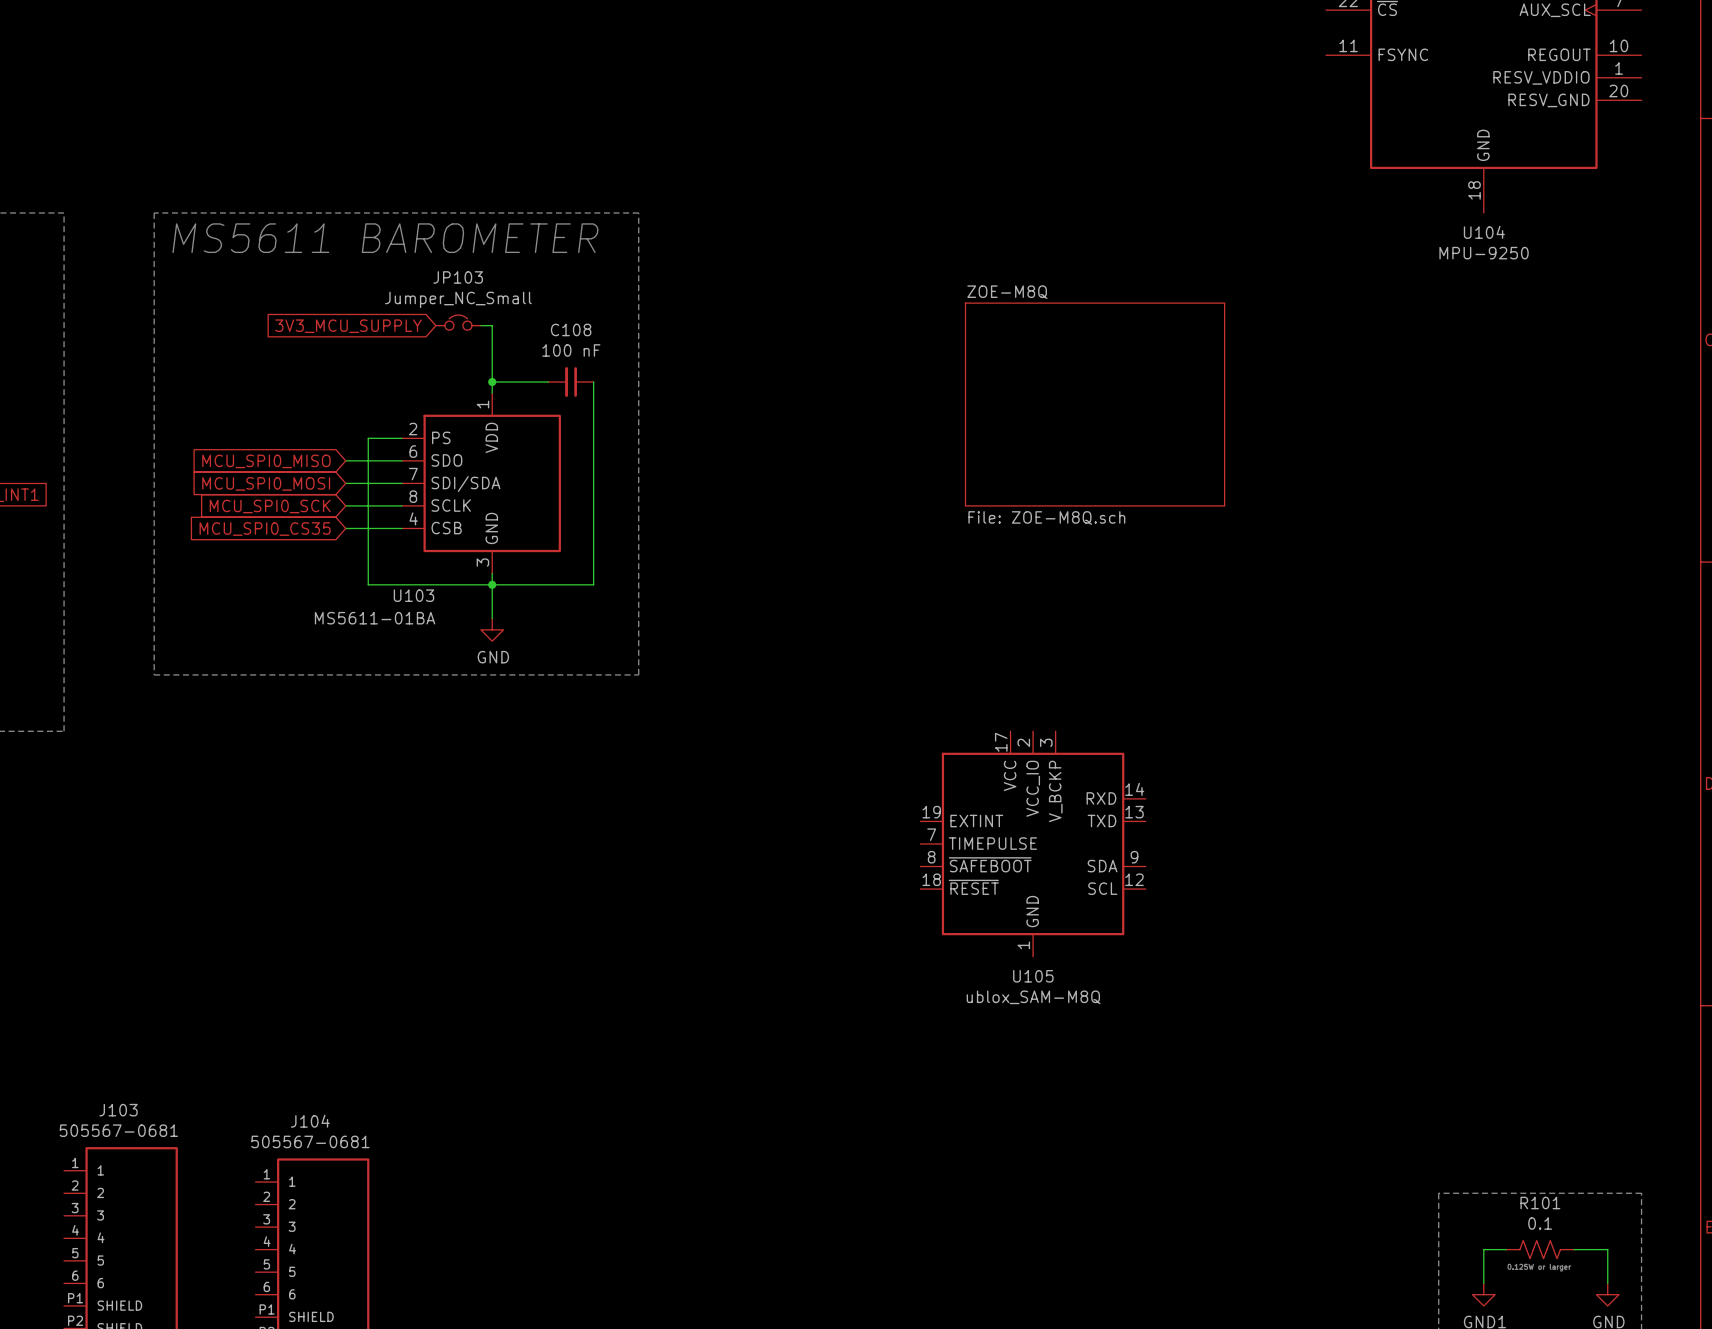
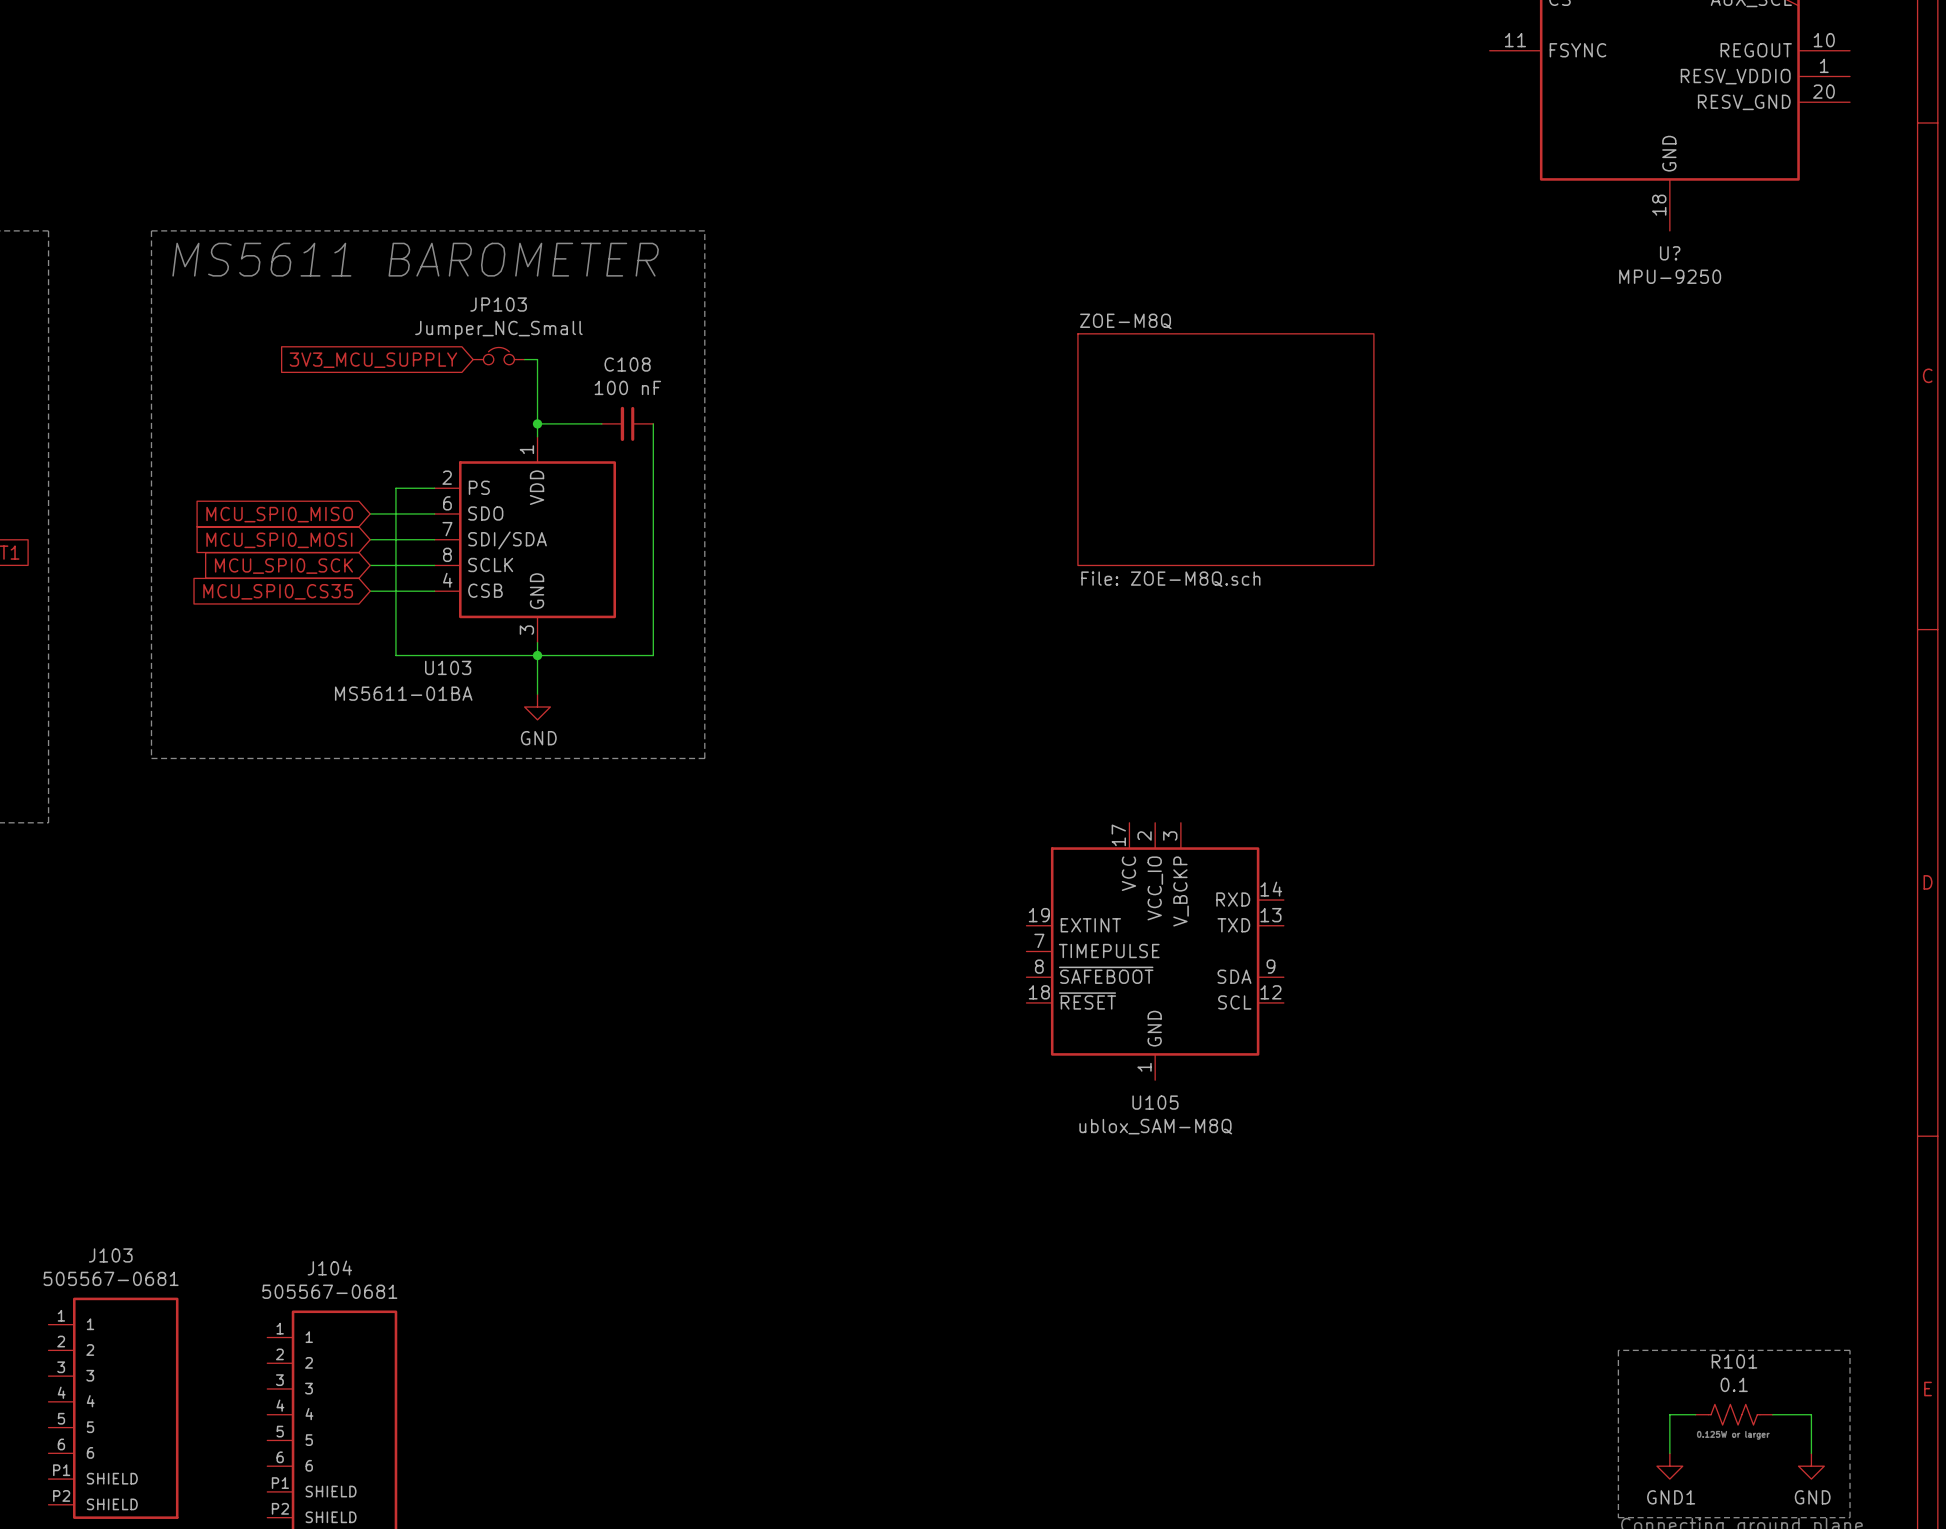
U104 name: U104 (1484, 232) -> U? (1670, 253)

